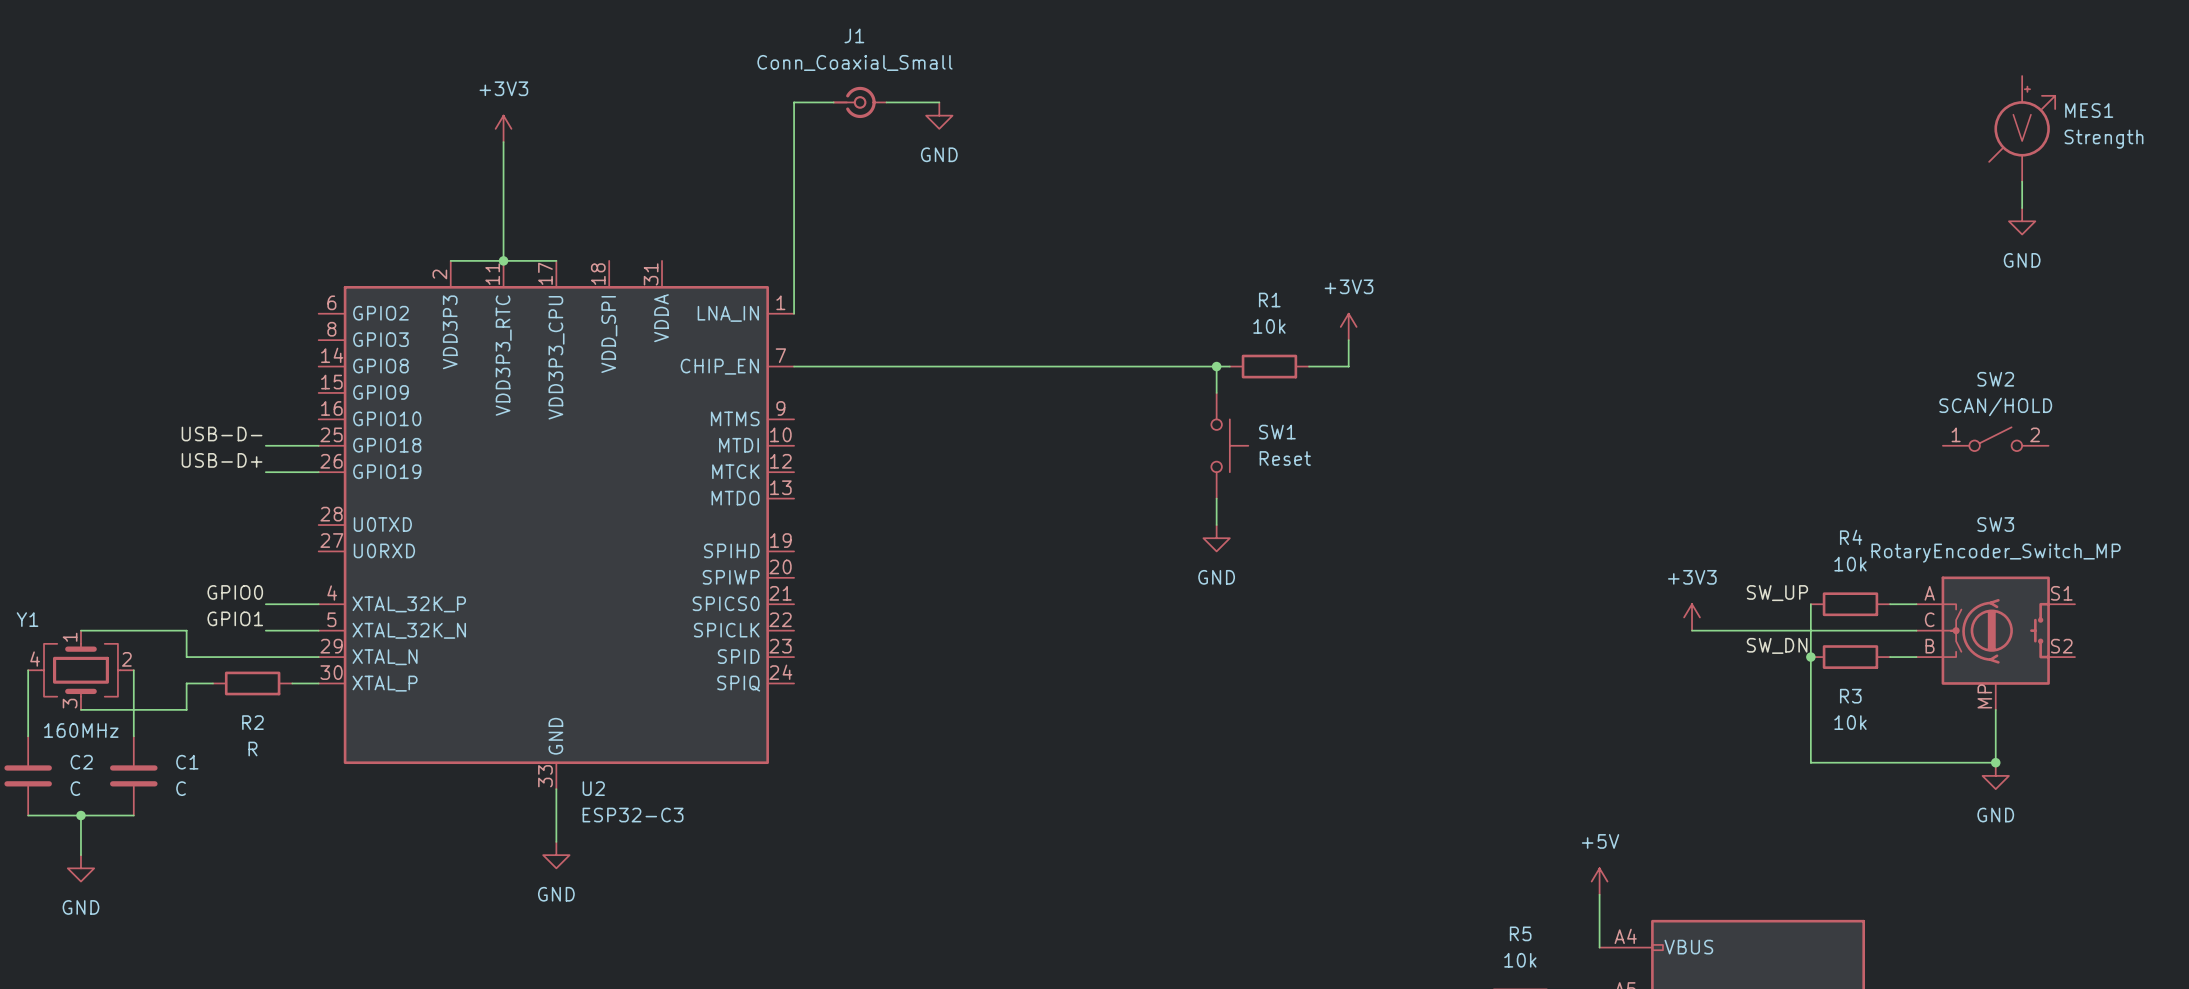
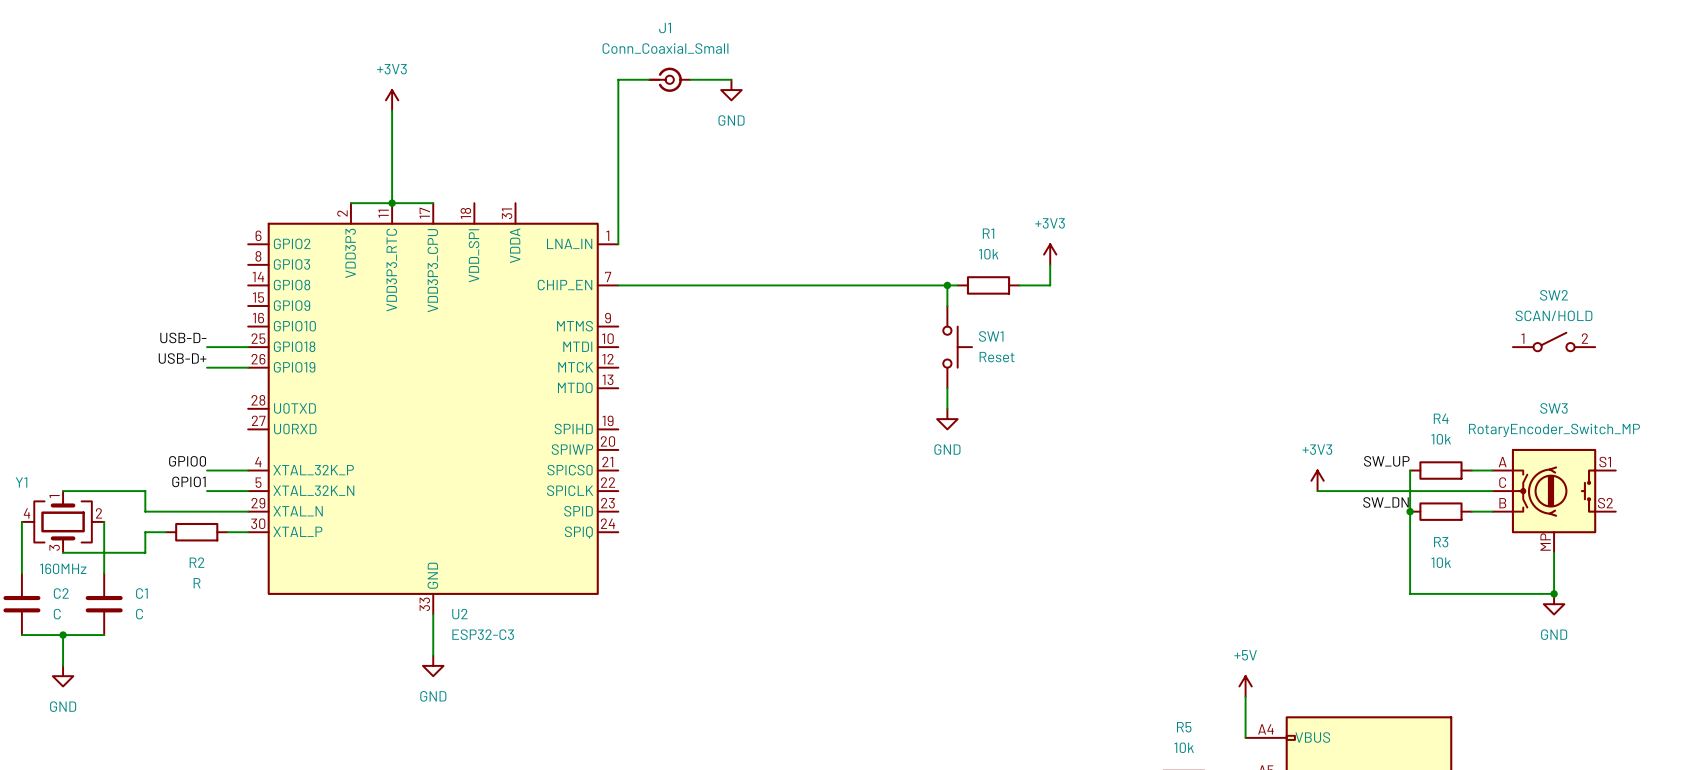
MES1: Strength (2022, 128) -> none
wire: (2022, 181) (2022, 208) -> none
power symbol: GND (2022, 221) -> none

